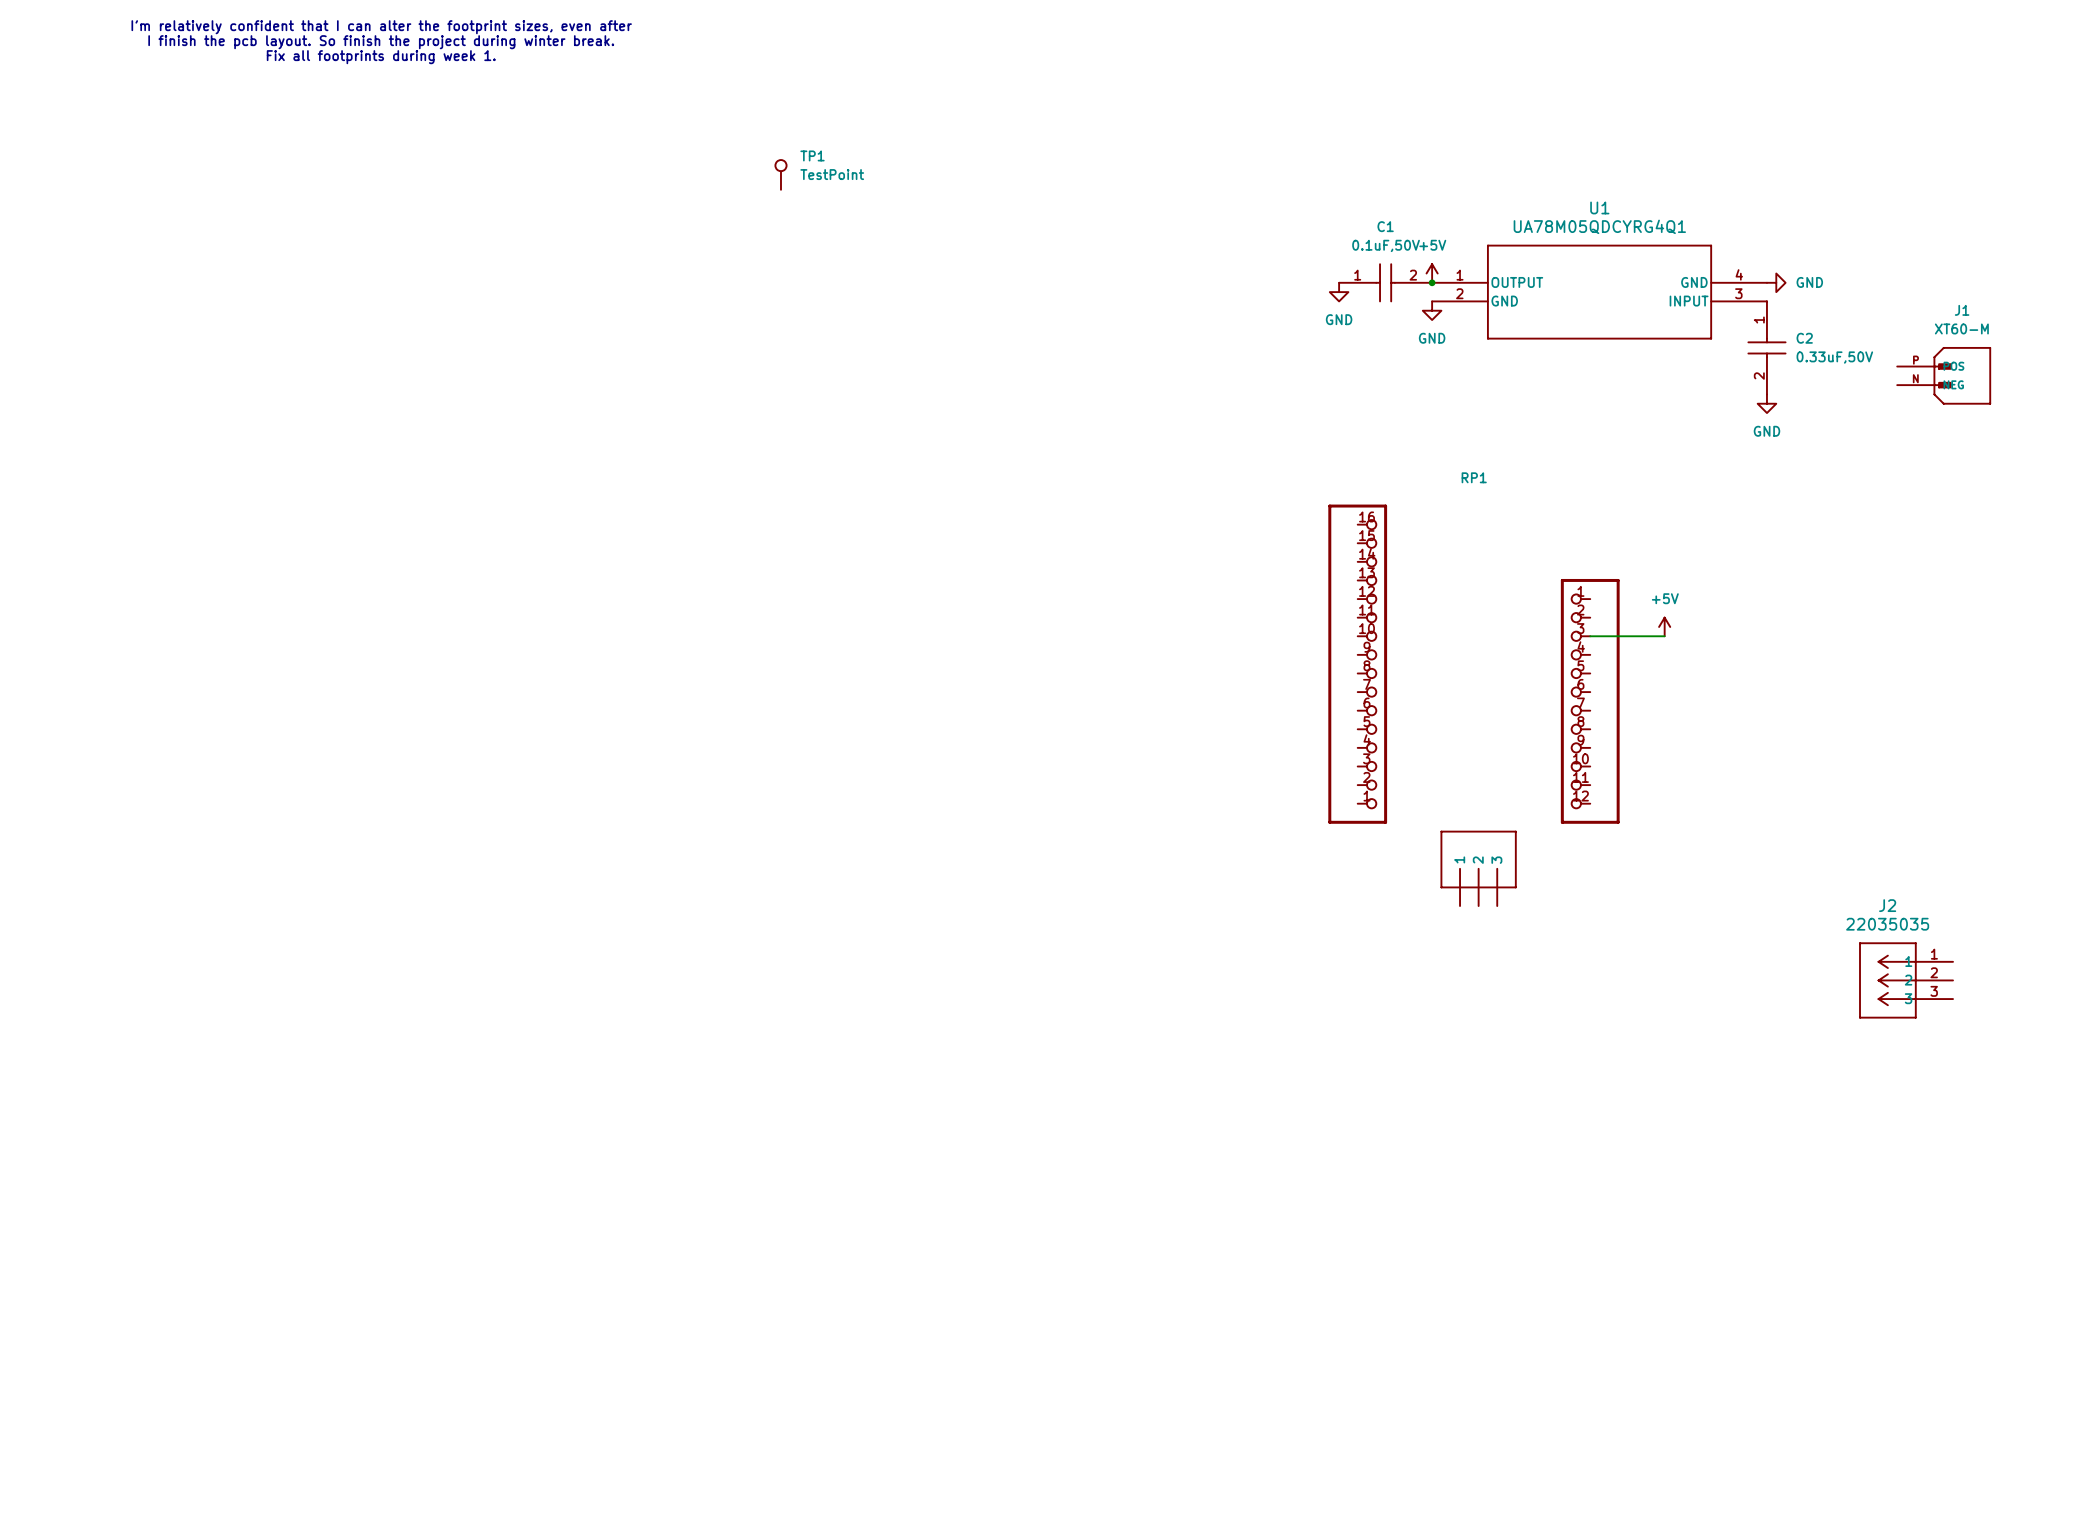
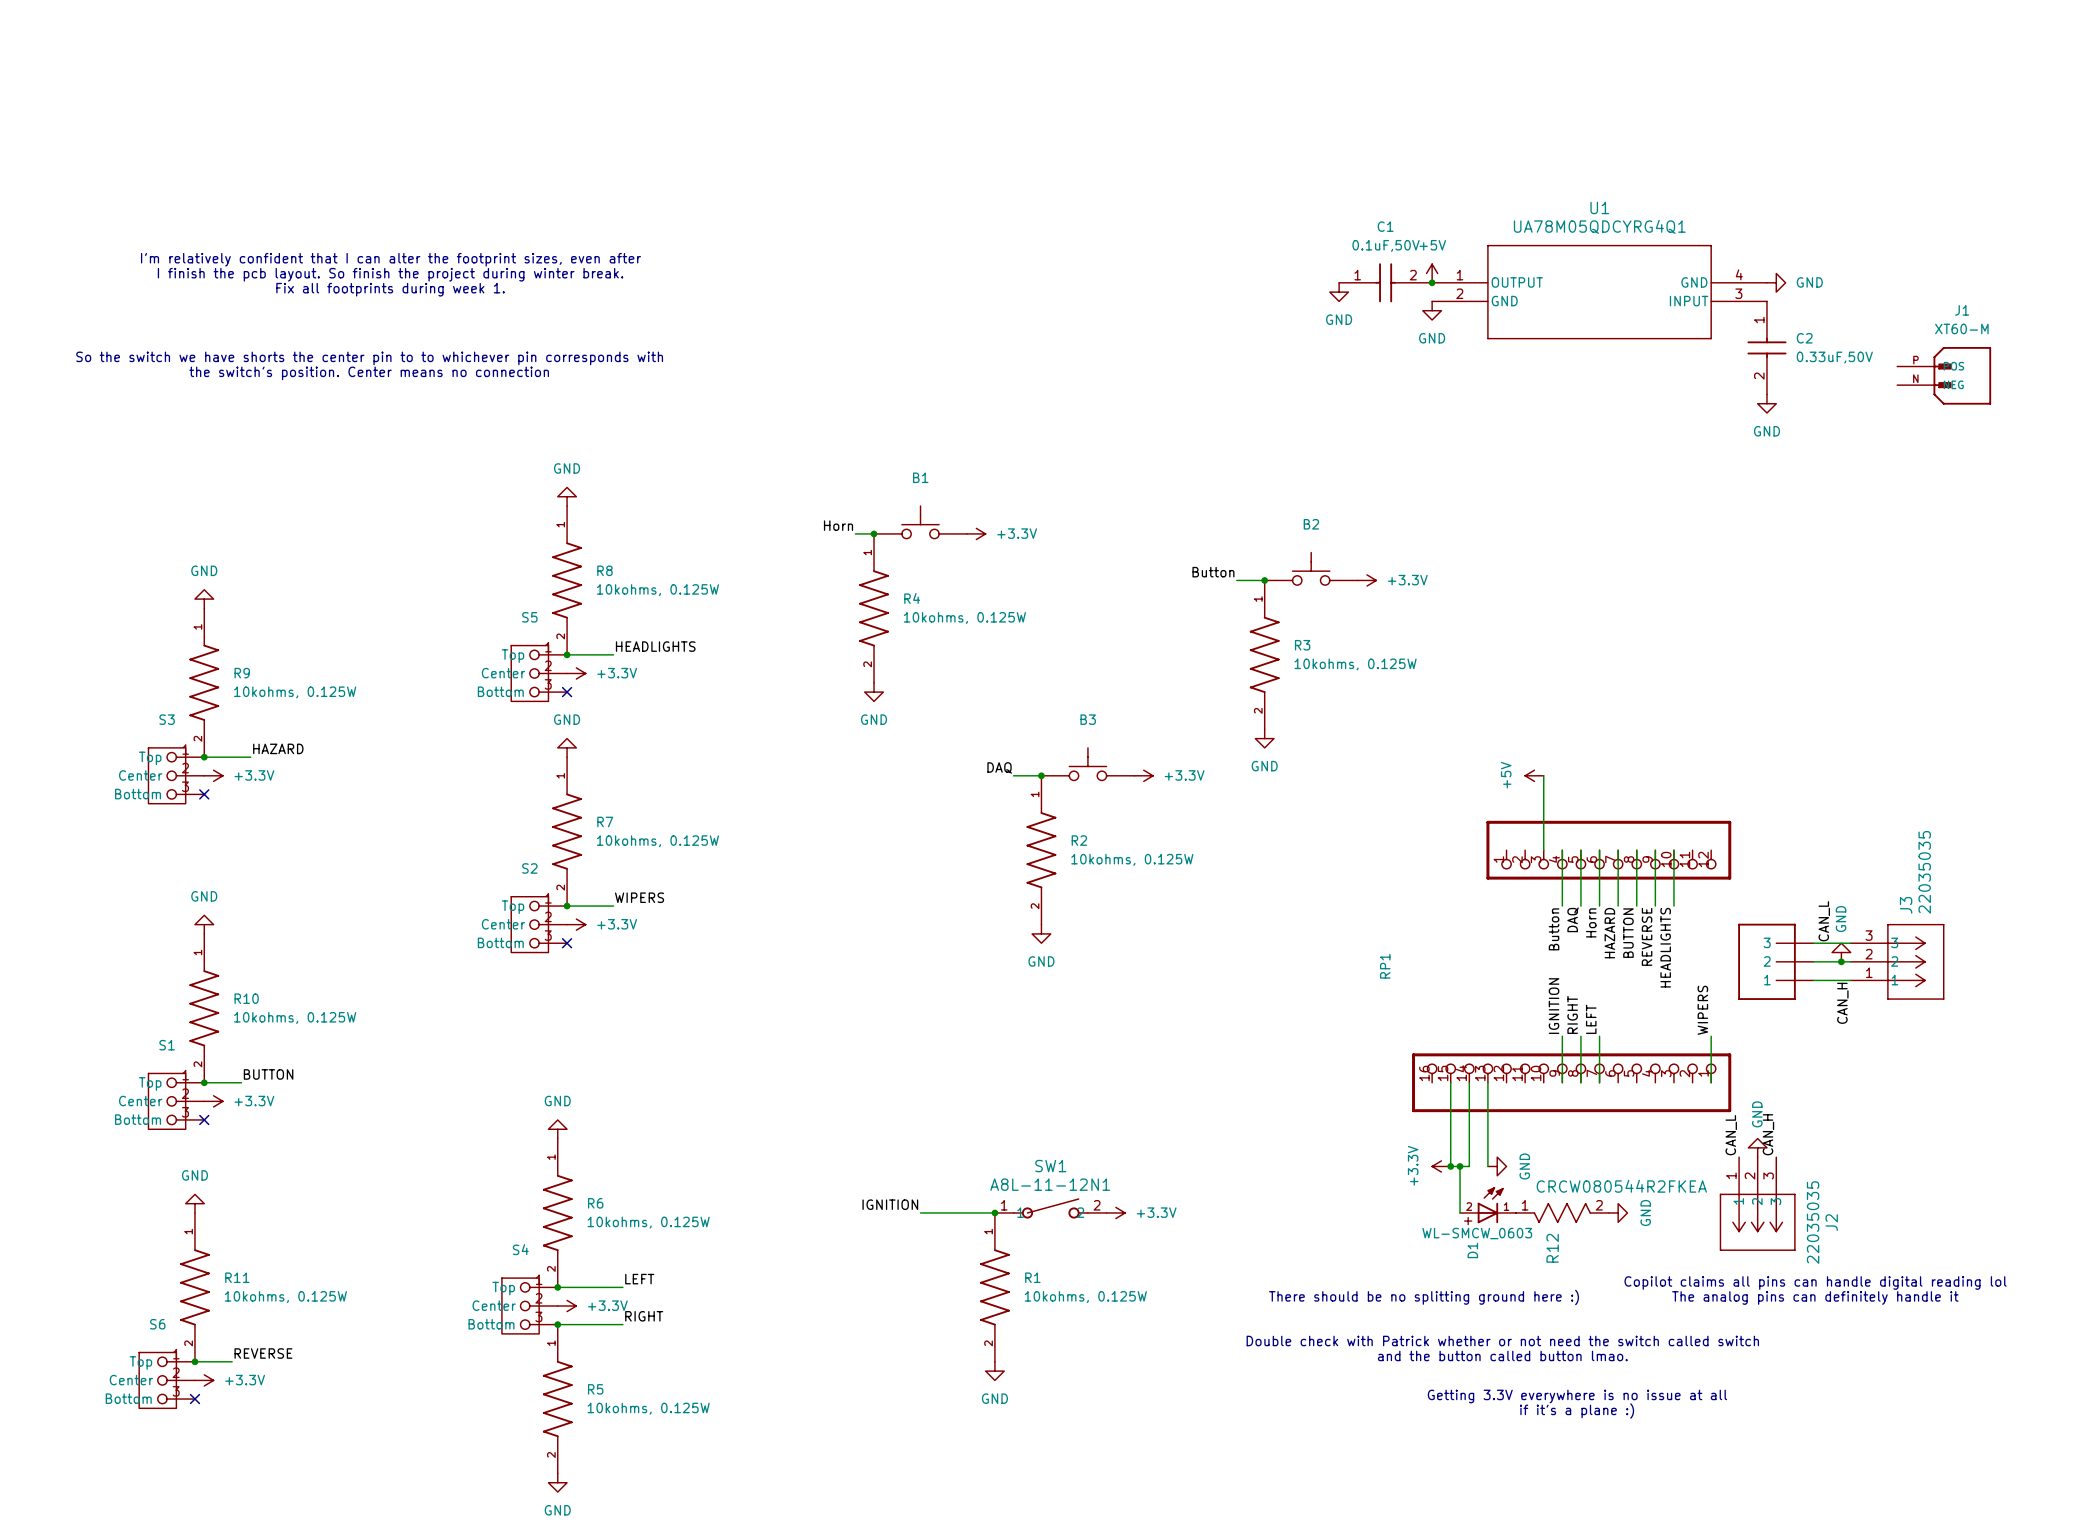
text: I'm relatively confident that I can alter the footprint sizes, even after (381, 27) -> none
text: I finish the pcb layout. So finish the project during winter break. (381, 42) -> none
text: Fix all footprints during week 1. (381, 57) -> none
TP1: TestPoint (780, 174) -> none
text: none -> I'm relatively confident that I can alter the footprint sizes, even after (390, 259)
text: none -> I finish the pcb layout. So finish the project during winter break. (390, 274)
text: none -> Fix all footprints during week 1. (390, 289)
text: none -> So the switch we have shorts the center pin to to whichever pin corresponds with (369, 358)
text: none -> the switch's position. Center means no connection (369, 373)
power symbol: none -> GND (567, 496)
B1: none -> (920, 522)
label: none -> Horn (838, 525)
wire: none -> (855, 533) (874, 533)
junction: none -> (874, 533)
power symbol: none -> +3.3V (976, 533)
B2: none -> (1311, 568)
label: none -> Button (1213, 572)
R8: none -> 10kohms, 0.125W (567, 580)
wire: none -> (1236, 580) (1264, 580)
junction: none -> (1264, 580)
power symbol: none -> +3.3V (1367, 580)
power symbol: none -> GND (204, 599)
R4: none -> 10kohms, 0.125W (874, 608)
power symbol: +5V (1664, 626) -> none
wire: (1590, 636) (1664, 636) -> none
label: none -> HEADLIGHTS (655, 646)
wire: none -> (567, 654) (613, 654)
junction: none -> (567, 654)
R3: none -> 10kohms, 0.125W (1264, 654)
S5: none -> (539, 673)
power symbol: none -> +3.3V (576, 673)
R9: none -> 10kohms, 0.125W (204, 682)
no-connect mark: none -> (567, 692)
power symbol: none -> GND (874, 692)
RP1 rotation: 0° (1473, 696) -> 90° counterclockwise (1603, 966)
RP1 position: (1473, 705) -> (1612, 966)
power symbol: none -> GND (1264, 738)
power symbol: none -> GND (567, 747)
label: none -> HAZARD (278, 748)
wire: none -> (204, 757) (250, 757)
junction: none -> (204, 757)
B3: none -> (1087, 764)
label: none -> DAQ (999, 767)
S3: none -> (176, 775)
power symbol: none -> +3.3V (213, 775)
wire: none -> (1013, 775) (1041, 775)
junction: none -> (1041, 775)
power symbol: none -> +3.3V (1143, 775)
power symbol: none -> +5V (1534, 775)
wire: none -> (1543, 775) (1543, 850)
no-connect mark: none -> (204, 794)
R7: none -> 10kohms, 0.125W (567, 831)
R2: none -> 10kohms, 0.125W (1041, 850)
wire: none -> (1562, 850) (1562, 906)
wire: none -> (1580, 850) (1580, 906)
wire: none -> (1599, 850) (1599, 906)
wire: none -> (1618, 850) (1618, 906)
wire: none -> (1636, 850) (1636, 906)
wire: none -> (1655, 850) (1655, 906)
wire: none -> (1673, 850) (1673, 906)
label: none -> WIPERS (639, 897)
J2 name position: J2 (1887, 905) -> J2 (1831, 1222)
wire: none -> (567, 906) (613, 906)
junction: none -> (567, 906)
label: none -> DAQ (1573, 919)
label: none -> CAN_L (1824, 921)
label: none -> Horn (1591, 922)
power symbol: none -> GND (204, 924)
S2: none -> (539, 924)
power symbol: none -> +3.3V (576, 924)
J2 value position: 22035035 (1887, 924) -> 22035035 (1813, 1222)
label: none -> Button (1554, 929)
power symbol: none -> GND (1041, 933)
label: none -> HAZARD (1609, 933)
label: none -> BUTTON (1628, 933)
label: none -> REVERSE (1647, 936)
no-connect mark: none -> (567, 943)
wire: none -> (1813, 943) (1850, 943)
label: none -> HEADLIGHTS (1665, 947)
power symbol: none -> GND (1841, 952)
wire: none -> (1813, 961) (1850, 961)
junction: none -> (1841, 961)
J3: none -> 22035035 (1897, 961)
wire: none -> (1813, 980) (1850, 980)
J2 rotation: 0° (1887, 980) -> 90° counterclockwise (1757, 1222)
J2 position: (1906, 980) -> (1757, 1203)
label: none -> CAN_H (1842, 1003)
label: none -> IGNITION (1554, 1006)
R10: none -> 10kohms, 0.125W (204, 1008)
label: none -> WIPERS (1702, 1010)
label: none -> RIGHT (1572, 1014)
label: none -> LEFT (1591, 1019)
wire: none -> (1562, 1036) (1562, 1082)
wire: none -> (1580, 1036) (1580, 1082)
wire: none -> (1599, 1036) (1599, 1082)
wire: none -> (1711, 1036) (1711, 1082)
label: none -> BUTTON (268, 1074)
wire: none -> (204, 1082) (241, 1082)
junction: none -> (204, 1082)
wire: none -> (1450, 1082) (1450, 1166) (1469, 1166) (1469, 1082)
wire: none -> (1487, 1082) (1487, 1166)
S1: none -> (176, 1101)
power symbol: none -> +3.3V (213, 1101)
no-connect mark: none -> (204, 1119)
power symbol: none -> GND (557, 1129)
label: none -> CAN_H (1768, 1134)
label: none -> CAN_L (1731, 1135)
power symbol: none -> GND (1757, 1147)
power symbol: none -> +3.3V (1441, 1166)
junction: none -> (1450, 1166)
wire: none -> (1460, 1166) (1460, 1212)
junction: none -> (1460, 1166)
power symbol: none -> GND (1497, 1166)
power symbol: none -> GND (194, 1203)
label: none -> IGNITION (890, 1204)
D1: none -> WL-SMCW_0603 (1487, 1205)
SW1: none -> A8L-11-12N1 (1050, 1208)
R6: none -> 10kohms, 0.125W (557, 1212)
wire: none -> (920, 1212) (994, 1212)
junction: none -> (994, 1212)
power symbol: none -> +3.3V (1115, 1212)
R12: none -> CRCW080544R2FKEA (1562, 1212)
power symbol: none -> GND (1618, 1212)
label: none -> LEFT (639, 1279)
text: none -> Copilot claims all pins can handle digital reading lol (1815, 1283)
R11: none -> 10kohms, 0.125W (194, 1287)
wire: none -> (557, 1287) (622, 1287)
junction: none -> (557, 1287)
R1: none -> 10kohms, 0.125W (994, 1287)
text: none -> There should be no splitting ground here :) (1424, 1297)
text: none -> The analog pins can definitely handle it (1815, 1297)
S4: none -> (529, 1306)
power symbol: none -> +3.3V (567, 1306)
label: none -> RIGHT (644, 1316)
wire: none -> (557, 1324) (622, 1324)
junction: none -> (557, 1324)
text: none -> Double check with Patrick whether or not need the switch called switch (1502, 1340)
label: none -> REVERSE (263, 1353)
text: none -> and the button called button lmao. (1502, 1355)
wire: none -> (194, 1361) (232, 1361)
junction: none -> (194, 1361)
power symbol: none -> GND (994, 1371)
S6: none -> (167, 1380)
power symbol: none -> +3.3V (204, 1380)
text: none -> Getting 3.3V everywhere is no issue at all (1577, 1396)
no-connect mark: none -> (194, 1399)
R5: none -> 10kohms, 0.125W (557, 1399)
text: none -> if it's a plane :) (1577, 1411)
power symbol: none -> GND (557, 1482)

